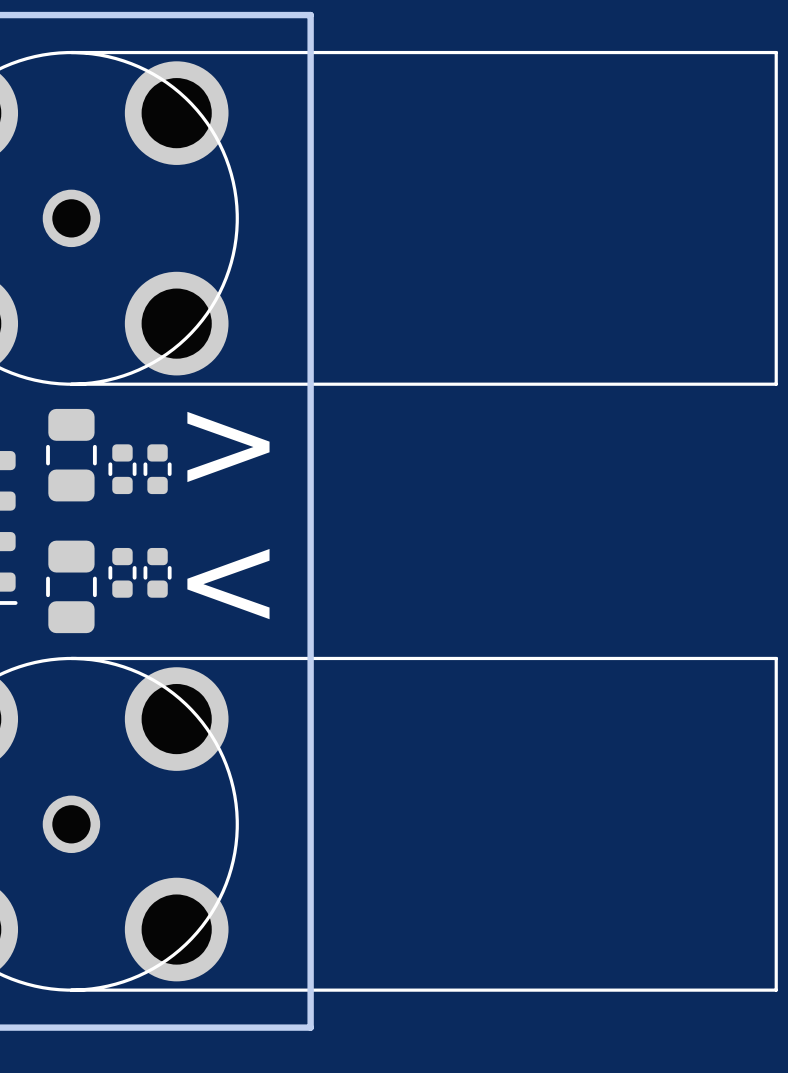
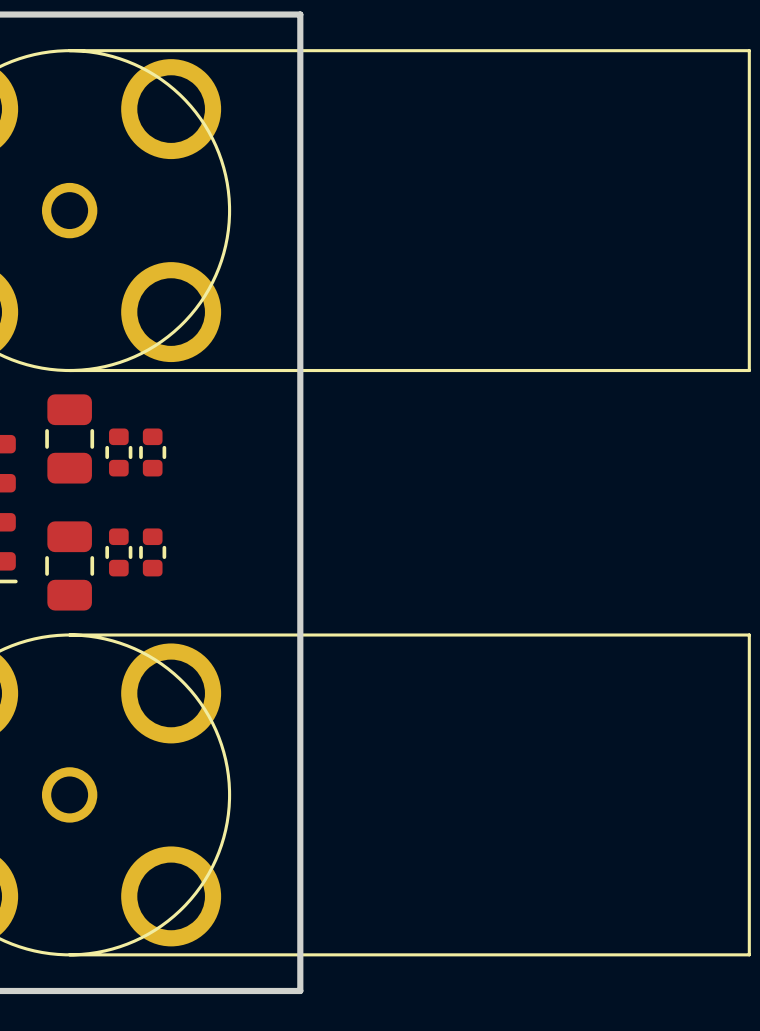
text: > (228, 446) -> none
text: < (228, 584) -> none

